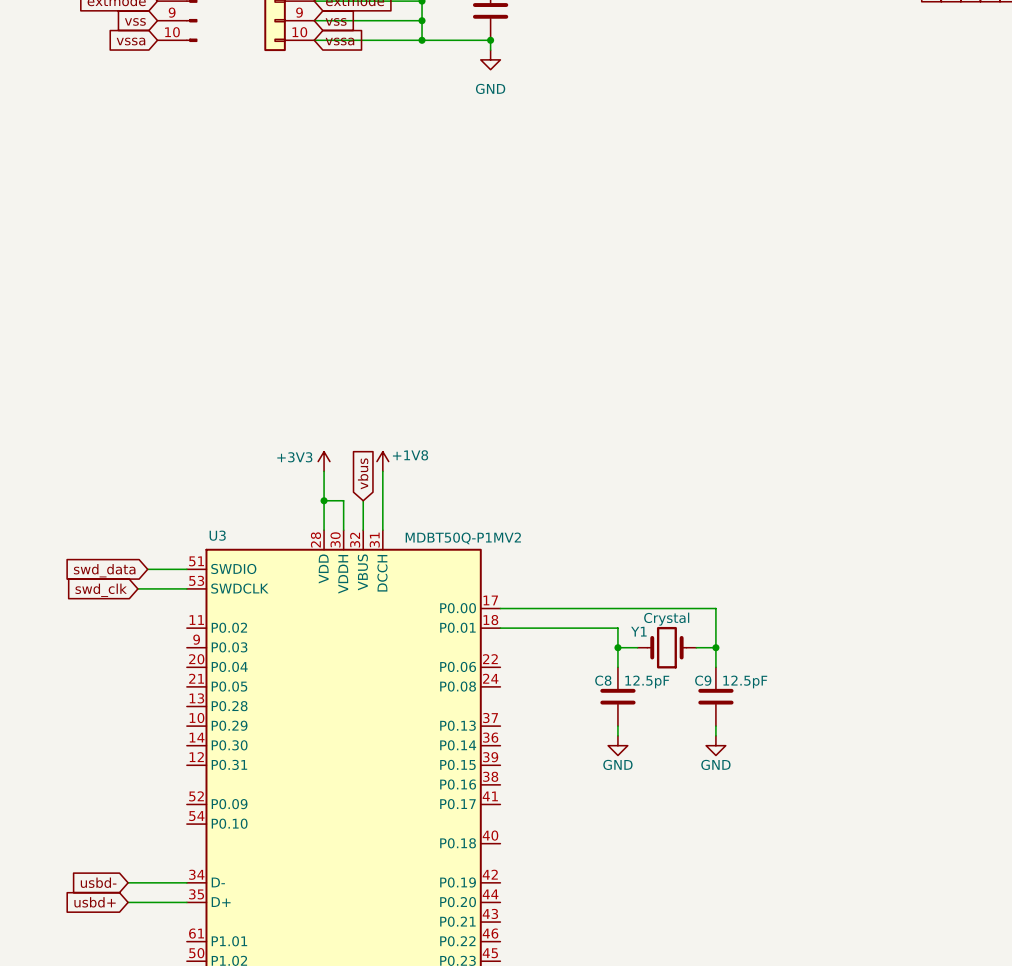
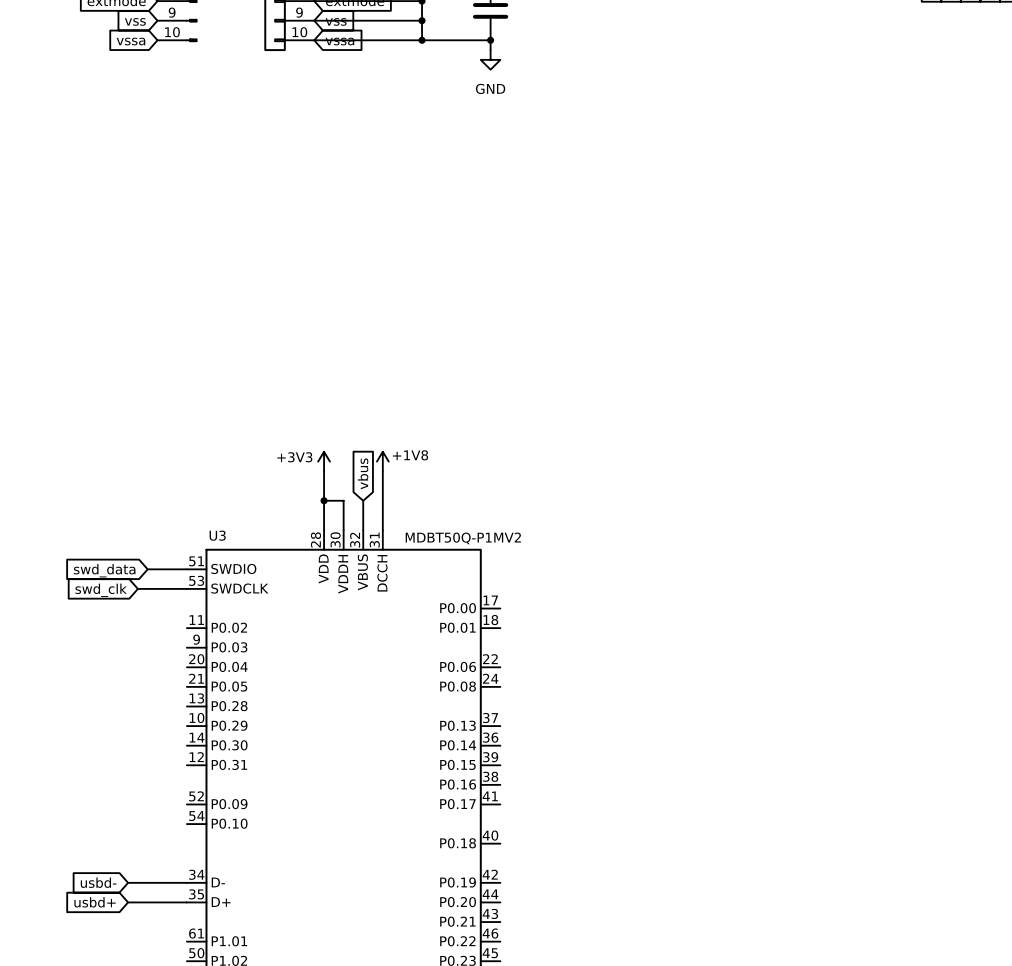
wire: (500, 608) (715, 608) (715, 667) -> none
wire: (500, 628) (617, 628) (617, 667) -> none
wire: (617, 647) (637, 647) -> none
junction: (617, 647) -> none
Y1: Crystal (666, 647) -> none
wire: (696, 647) (715, 647) -> none
junction: (715, 647) -> none
C8: 12.5pF (617, 696) -> none
C9: 12.5pF (715, 696) -> none
wire: (617, 726) (617, 735) -> none
wire: (715, 726) (715, 735) -> none
power symbol: GND (617, 745) -> none
power symbol: GND (715, 745) -> none

